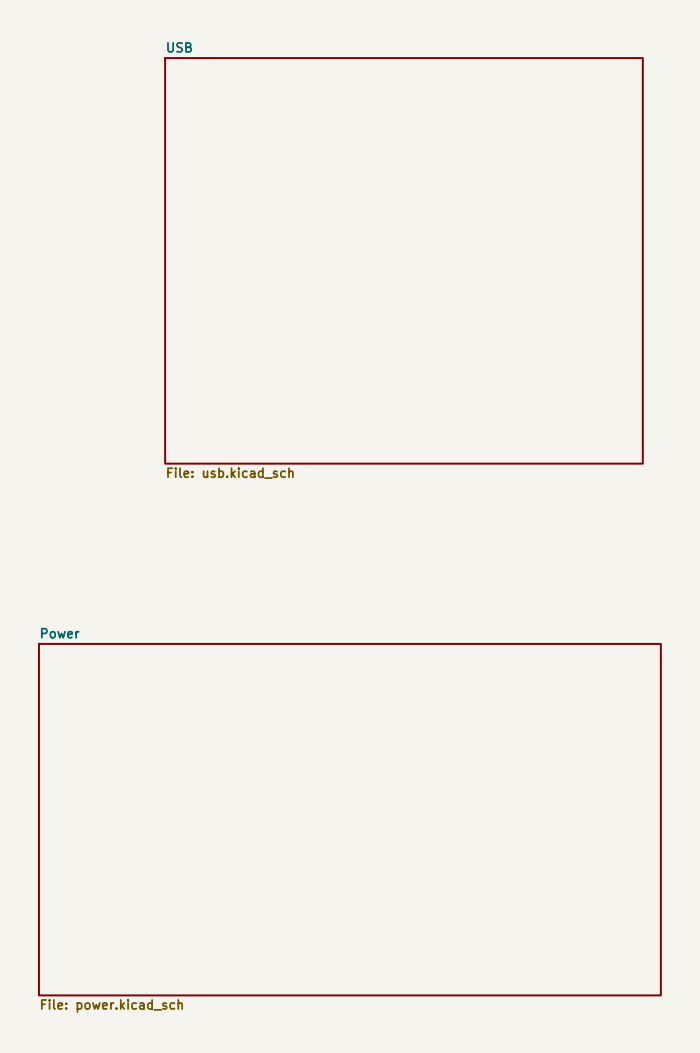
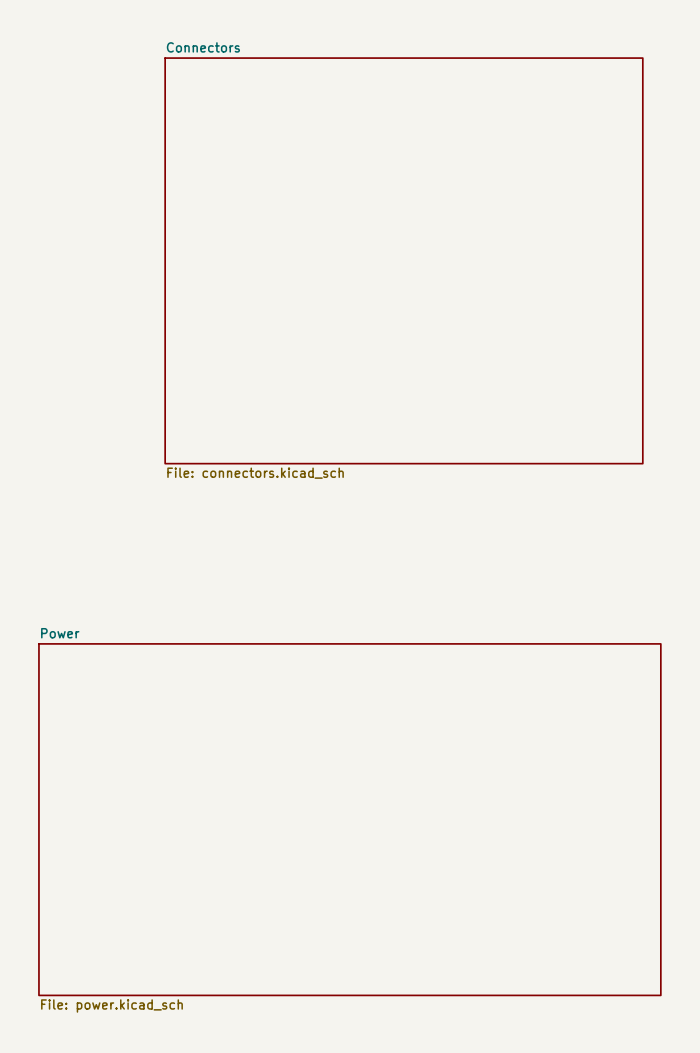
sheet USB name: USB (179, 47) -> Connectors (203, 47)
sheet USB value: File: usb.kicad_sch (230, 473) -> File: connectors.kicad_sch (255, 473)

